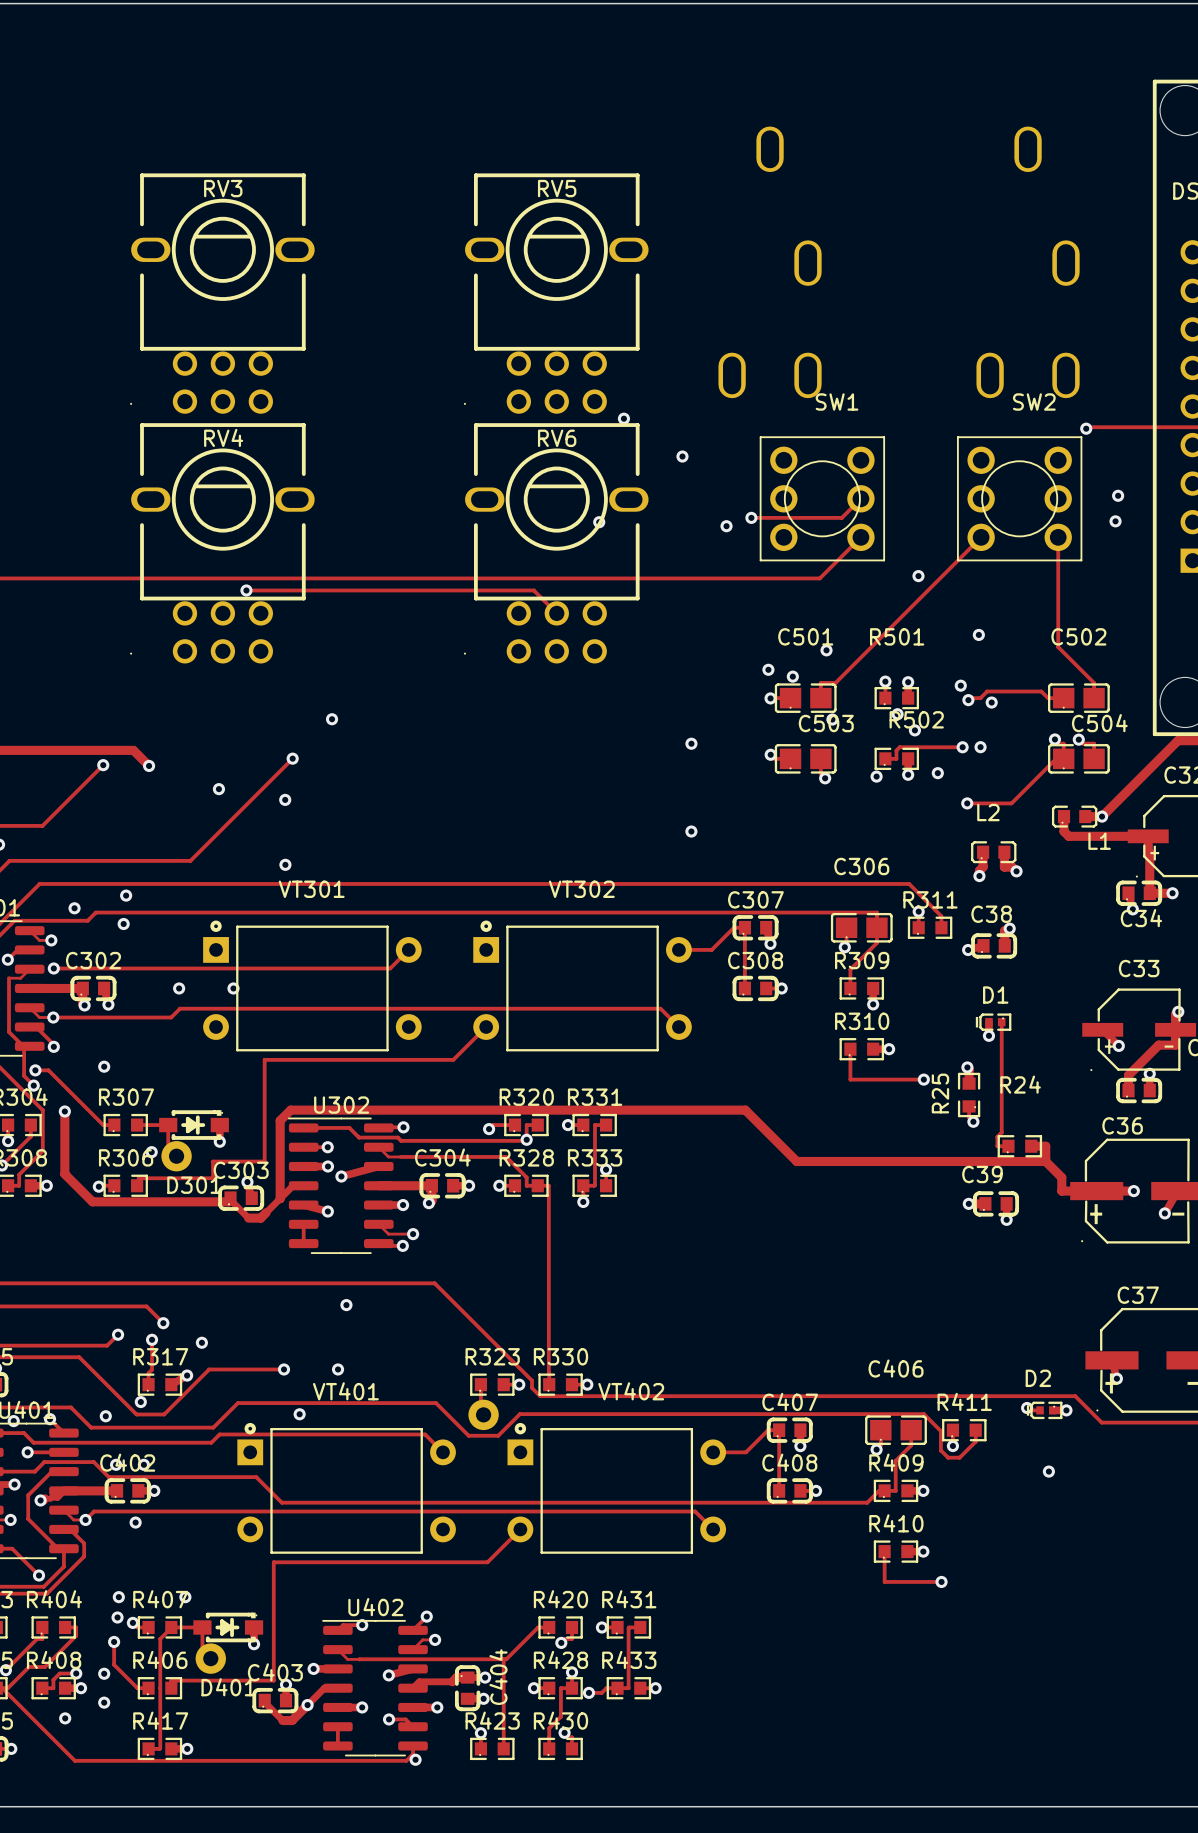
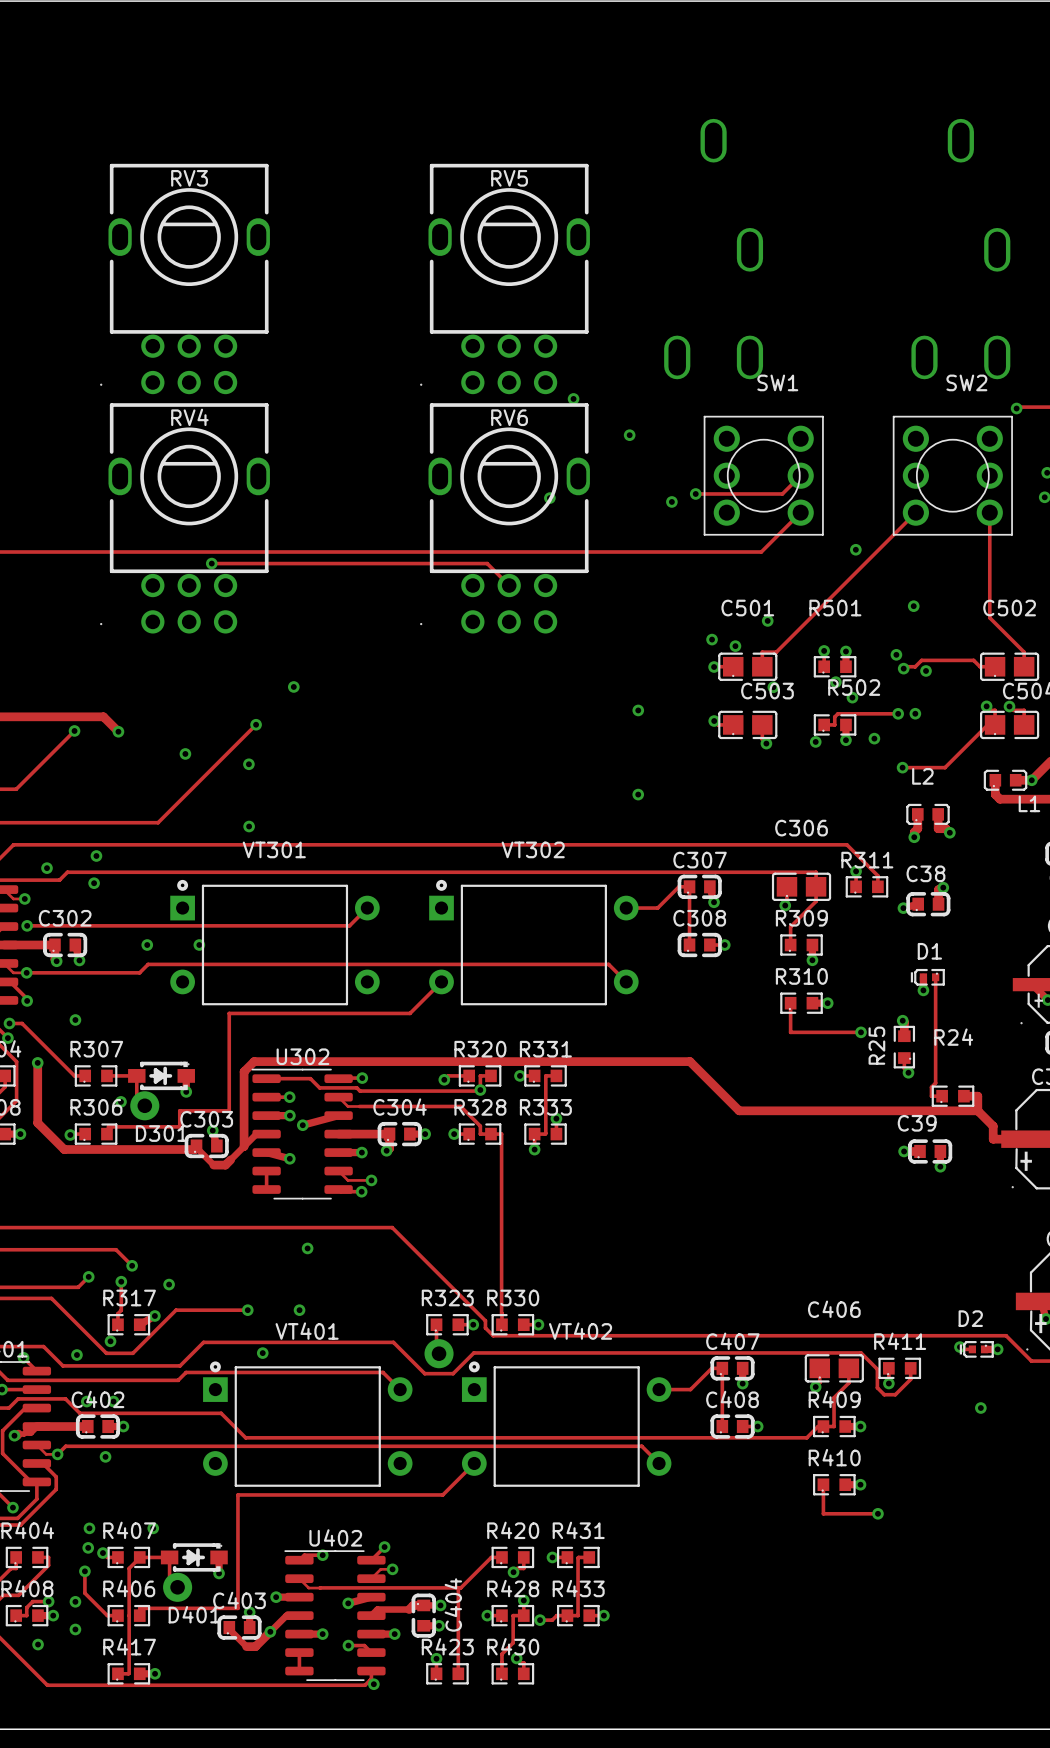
RV3 footprint: [130, 173, 315, 414] -> [100, 163, 270, 395]
RV5 footprint: [464, 173, 649, 414] -> [420, 163, 590, 395]
RV4 footprint: [130, 423, 315, 664] -> [100, 403, 270, 634]
RV6 footprint: [464, 423, 649, 664] -> [420, 403, 590, 634]

